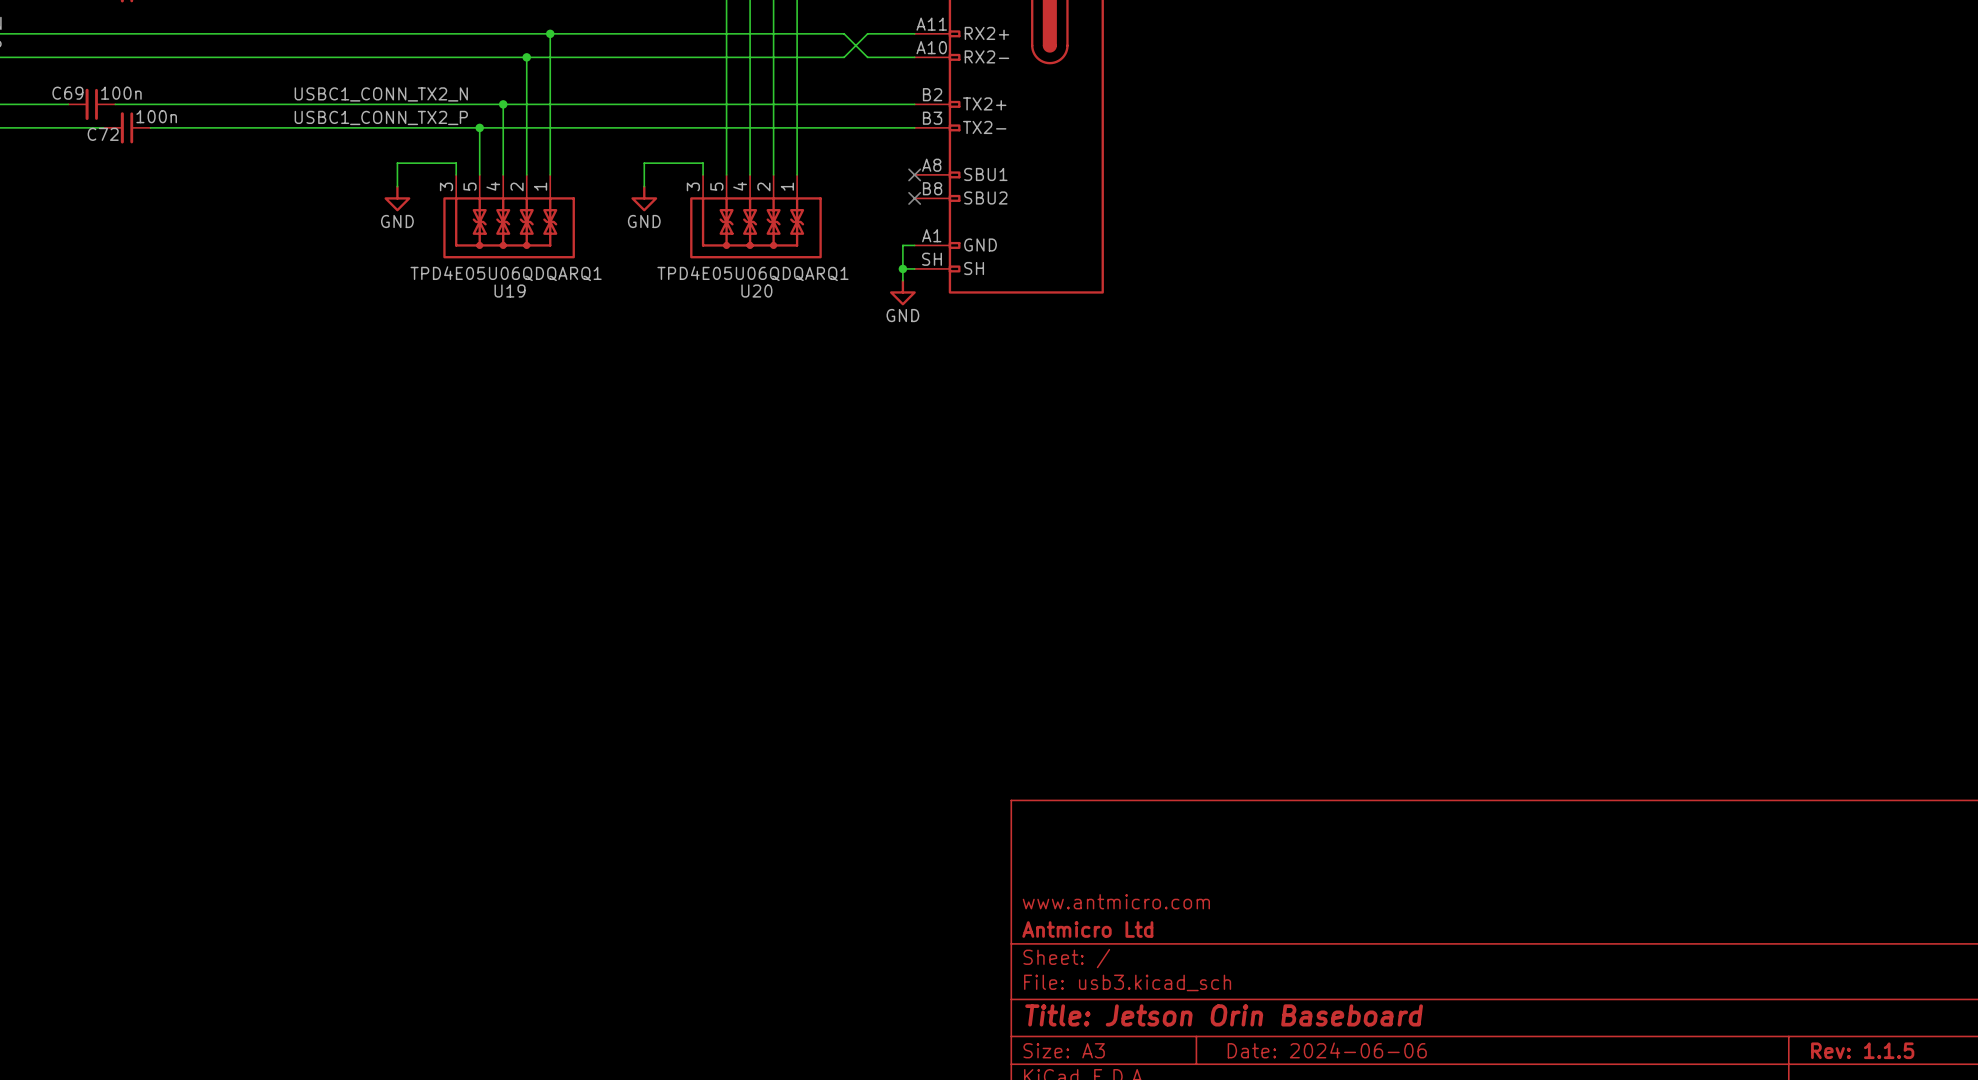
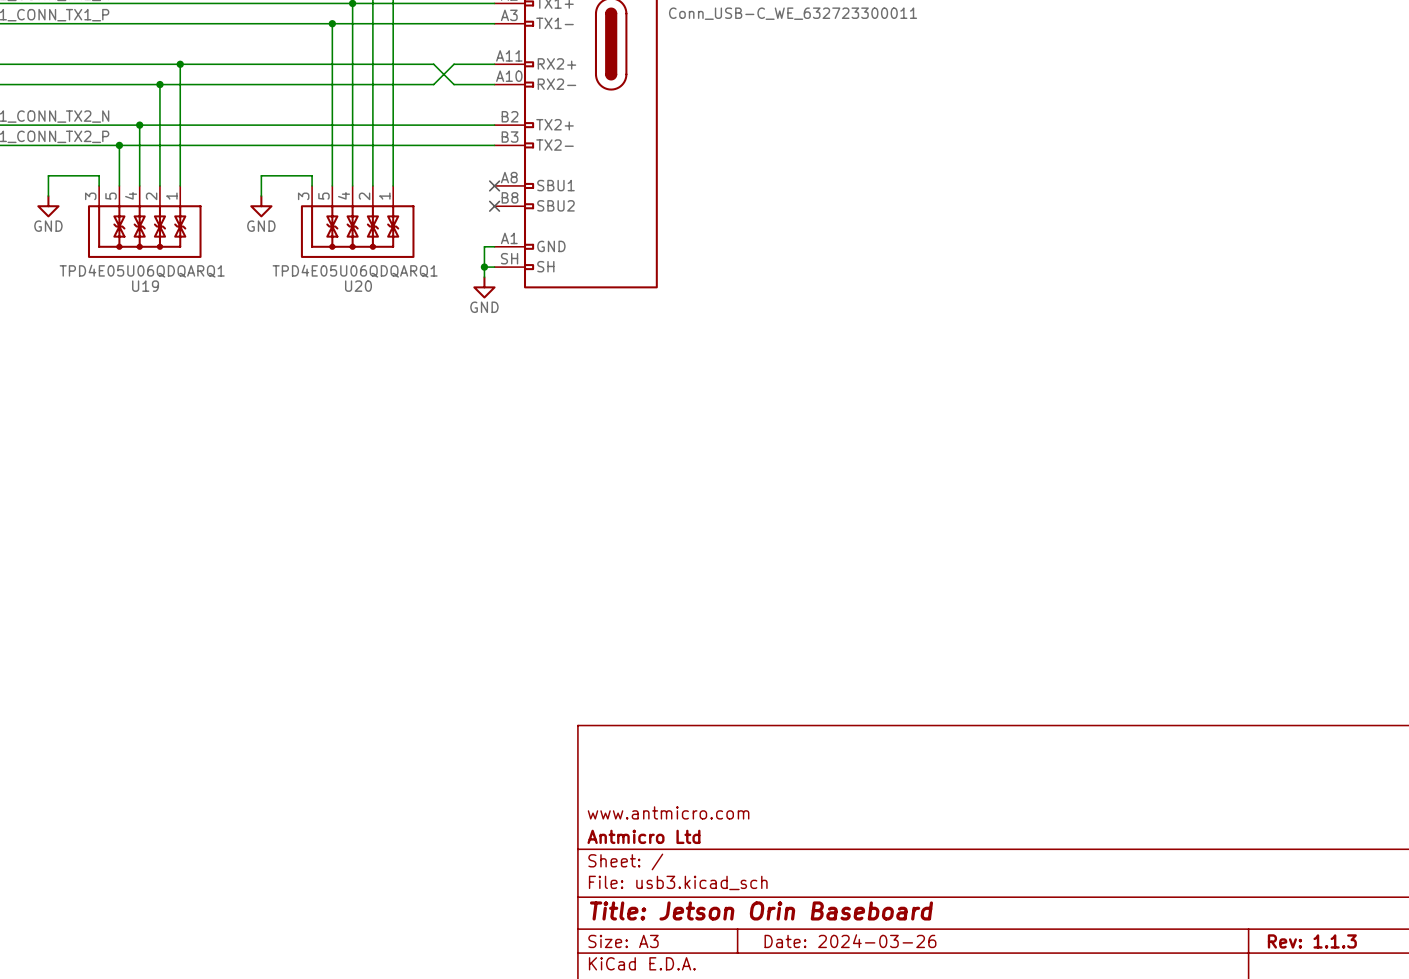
title block: Date: 2024-06-06 (1327, 1050) -> Date: 2024-03-26 (850, 941)
title block: Rev: 1.1.5 (1862, 1050) -> Rev: 1.1.3 (1312, 941)

